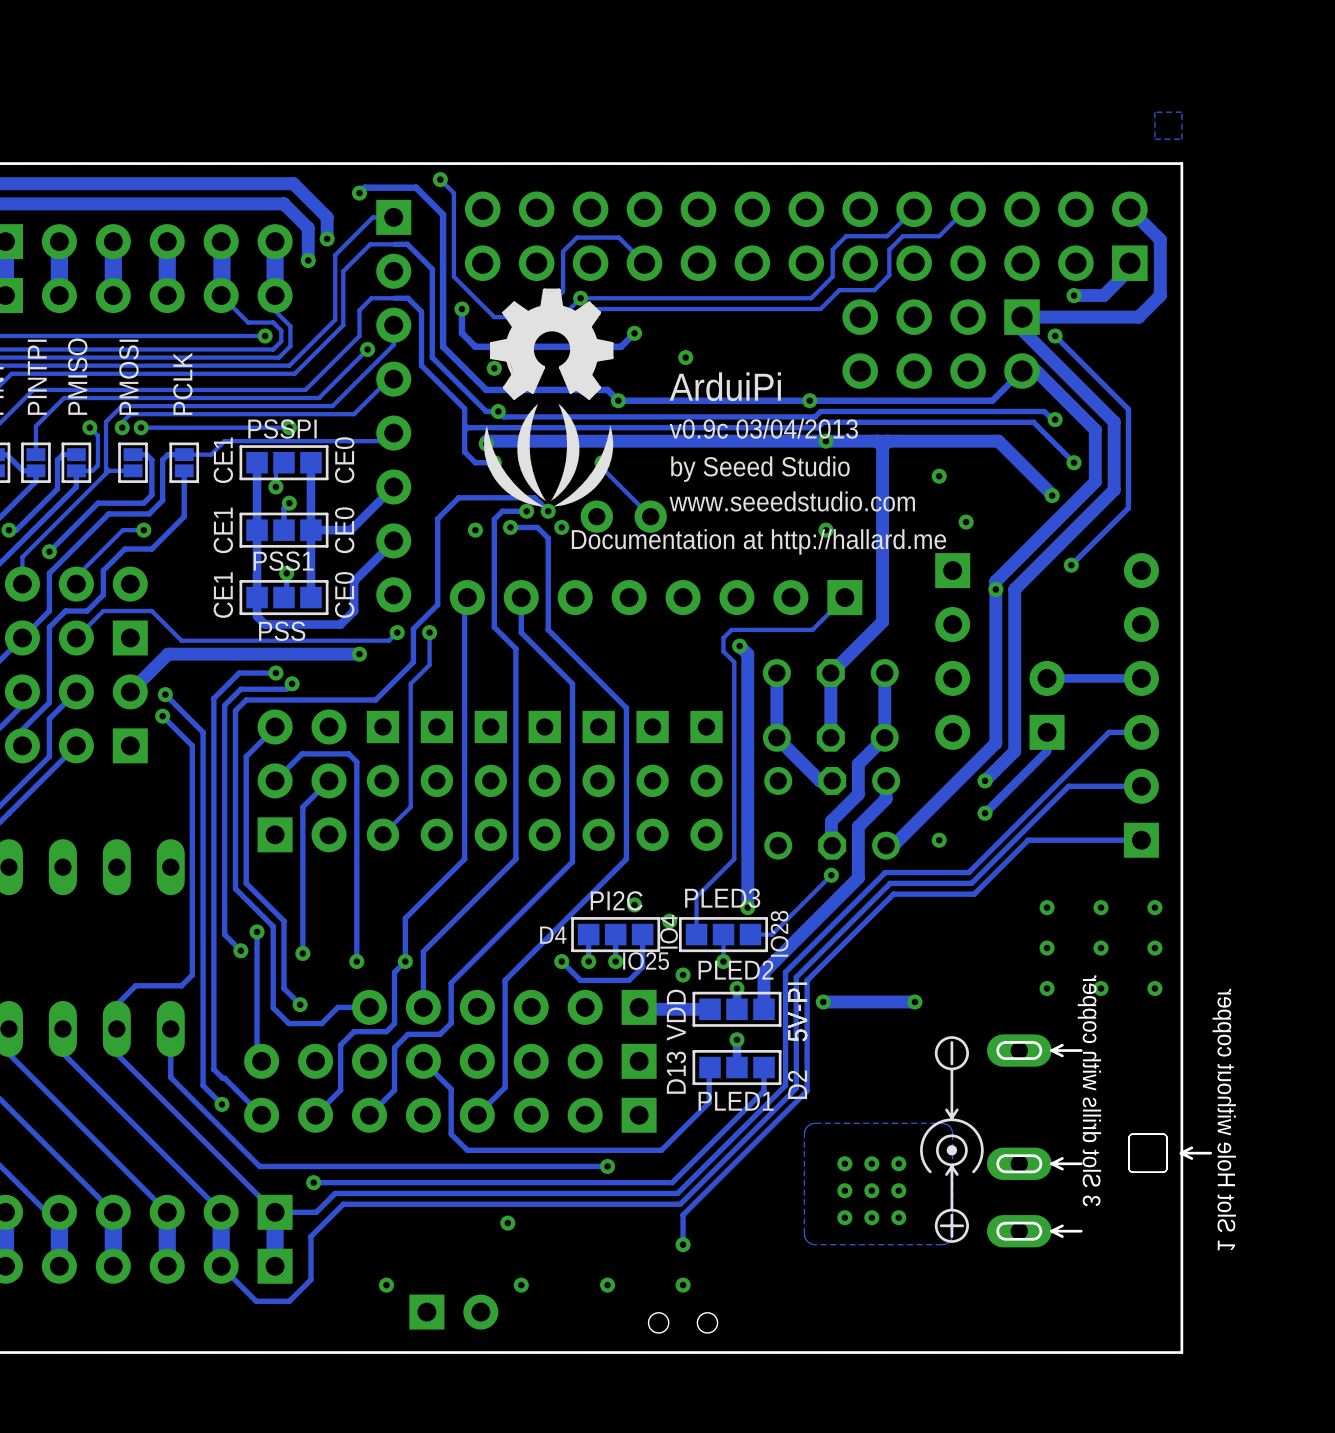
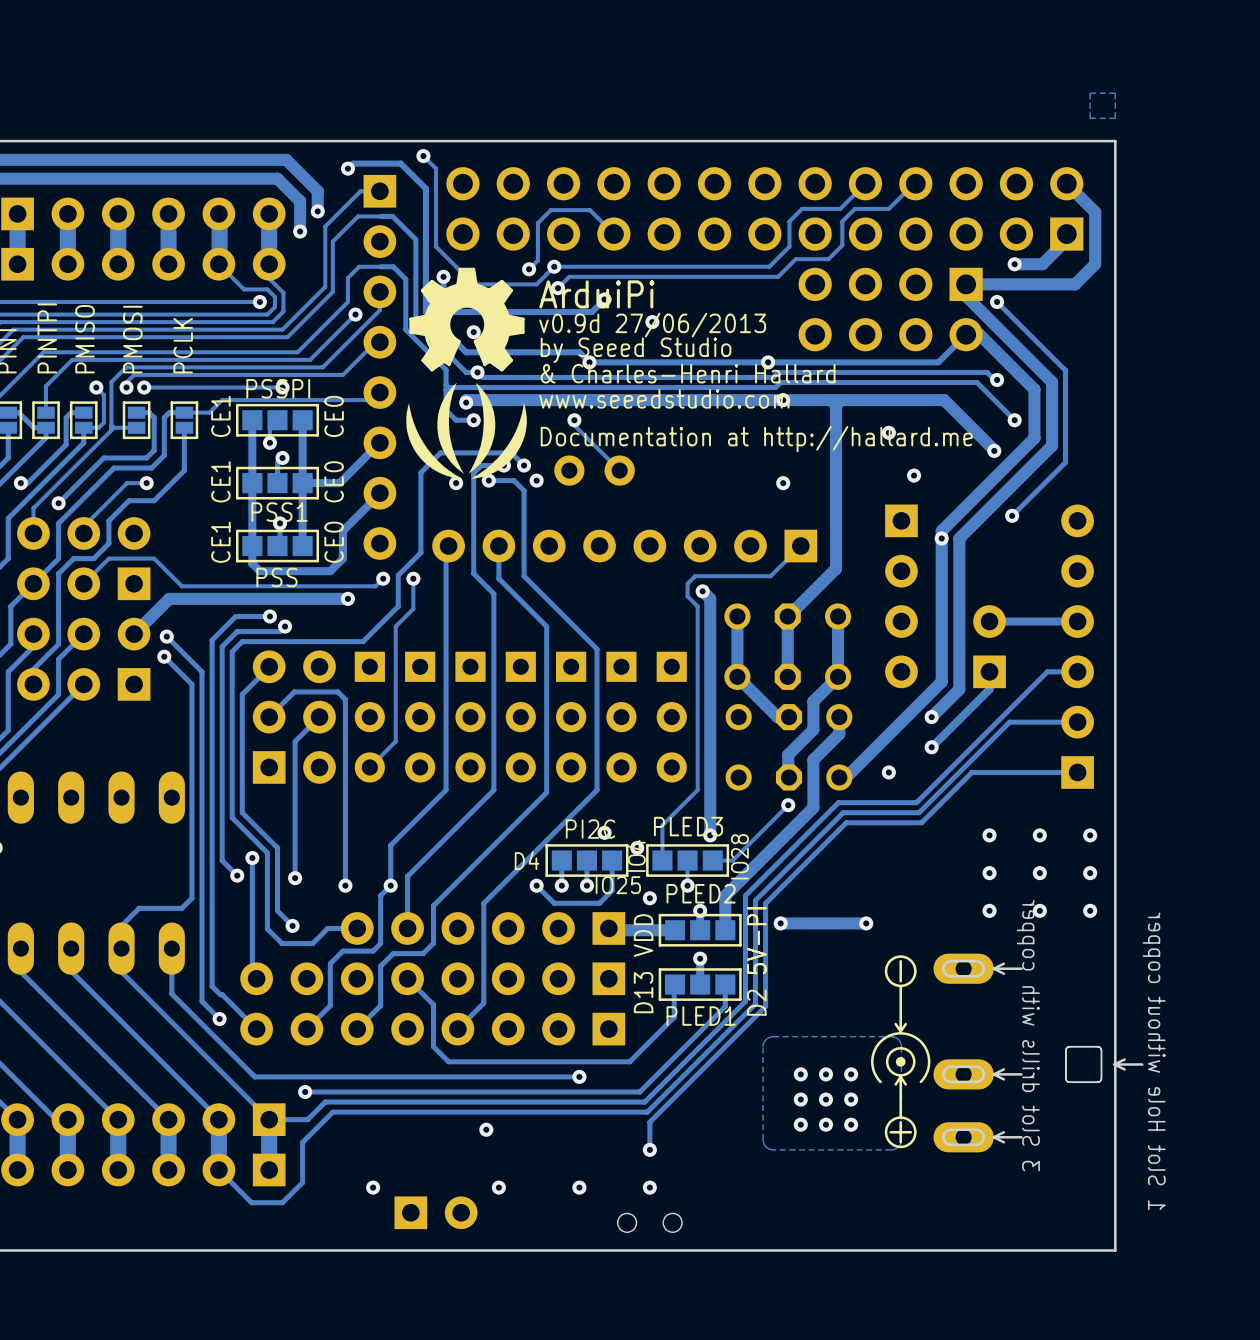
drawing position: (551, 344) -> (466, 319)
text: none -> v0.9d 27/06/2013 (652, 325)
text position: ArduiPi (725, 386) -> ArduiPi (596, 294)
text: none -> & Charles-Henri Hallard (688, 373)
text: v0.9c 03/04/2013 (763, 428) -> none
drawing position: (548, 455) -> (466, 430)
text position: by Seeed Studio (760, 469) -> by Seeed Studio (636, 350)
text position: www.seeedstudio.com (792, 501) -> www.seeedstudio.com (664, 398)
text position: Documentation at http://hallard.me (759, 541) -> Documentation at http://hallard.me (756, 439)

